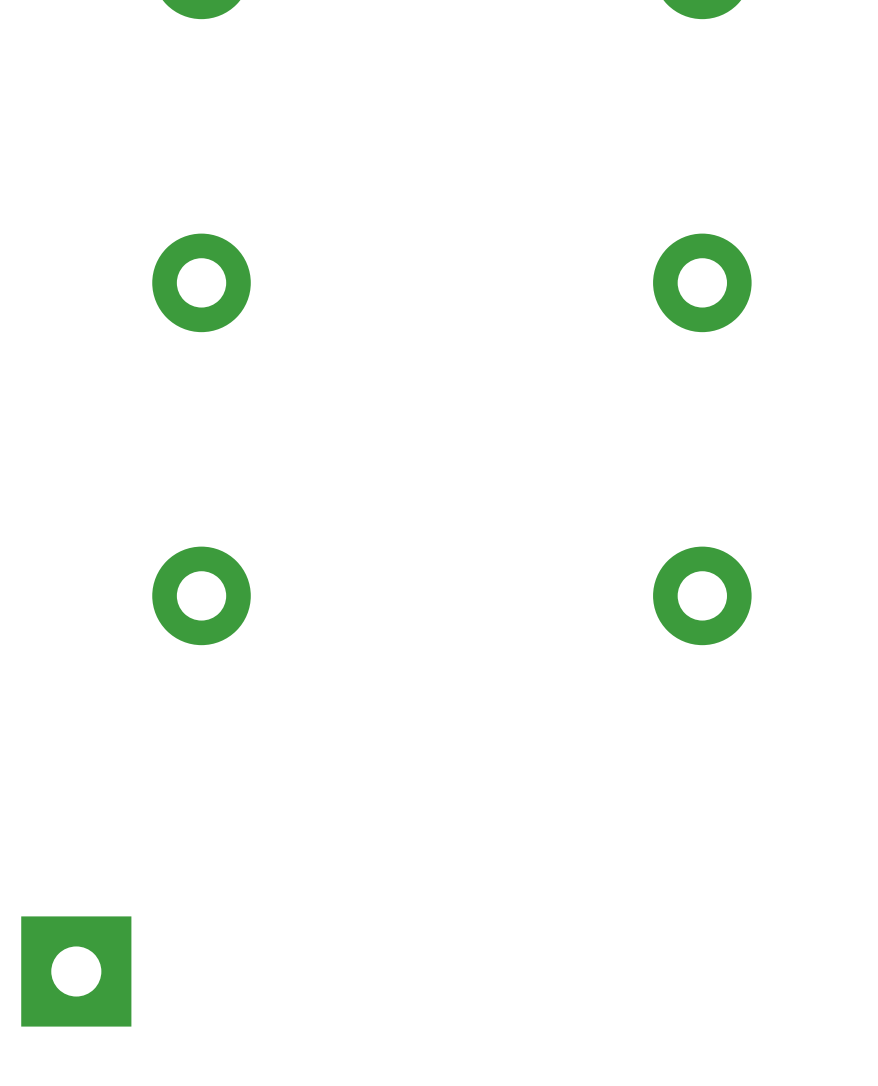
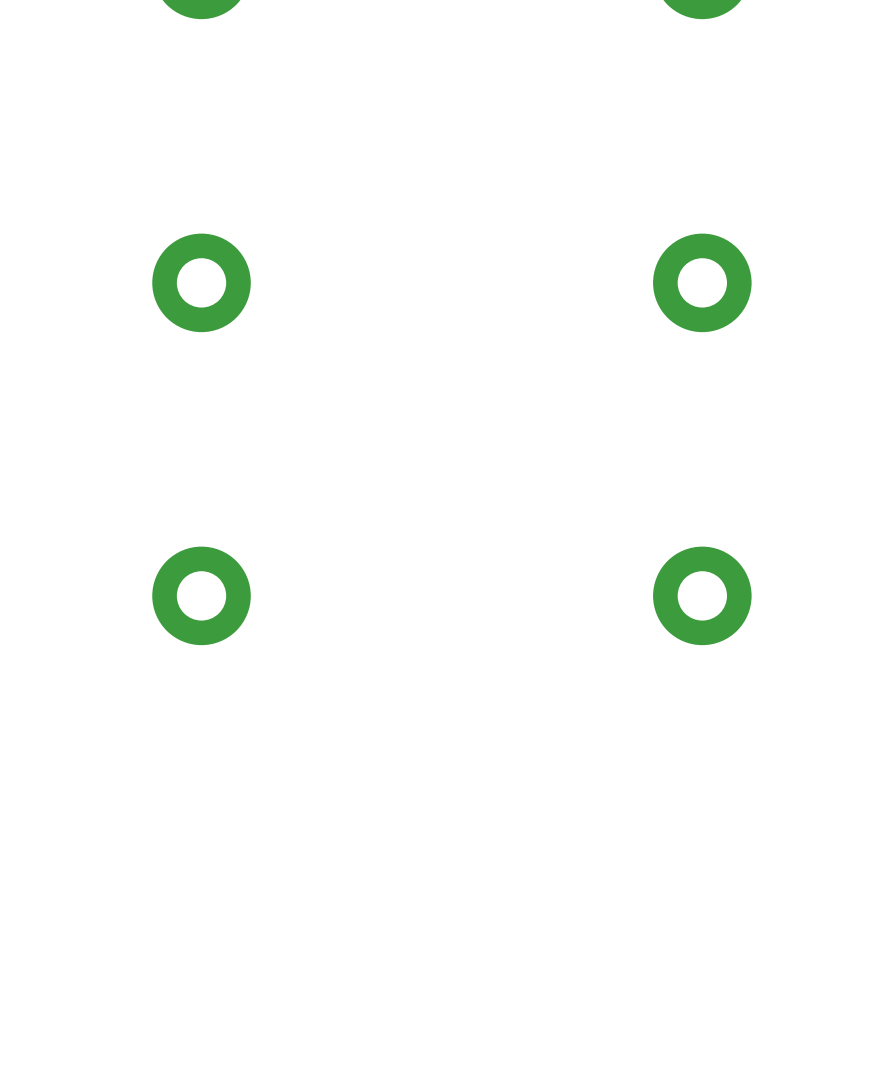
part: (76, 971) -> none

